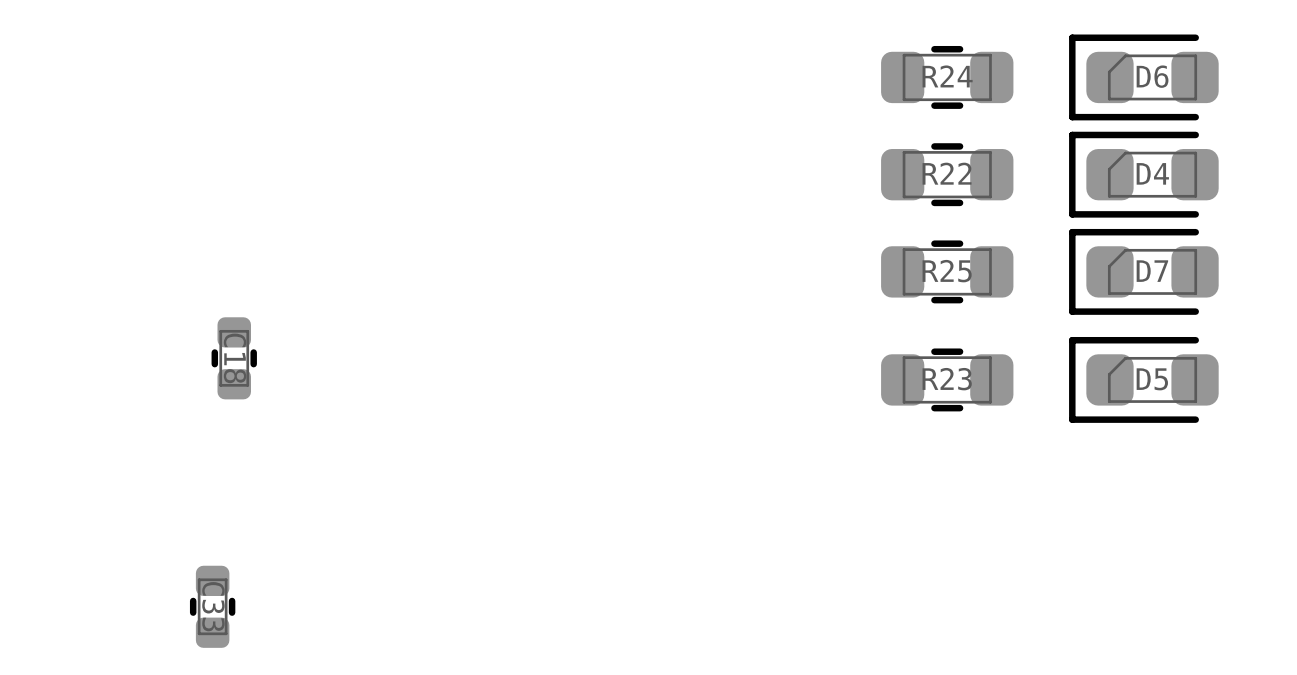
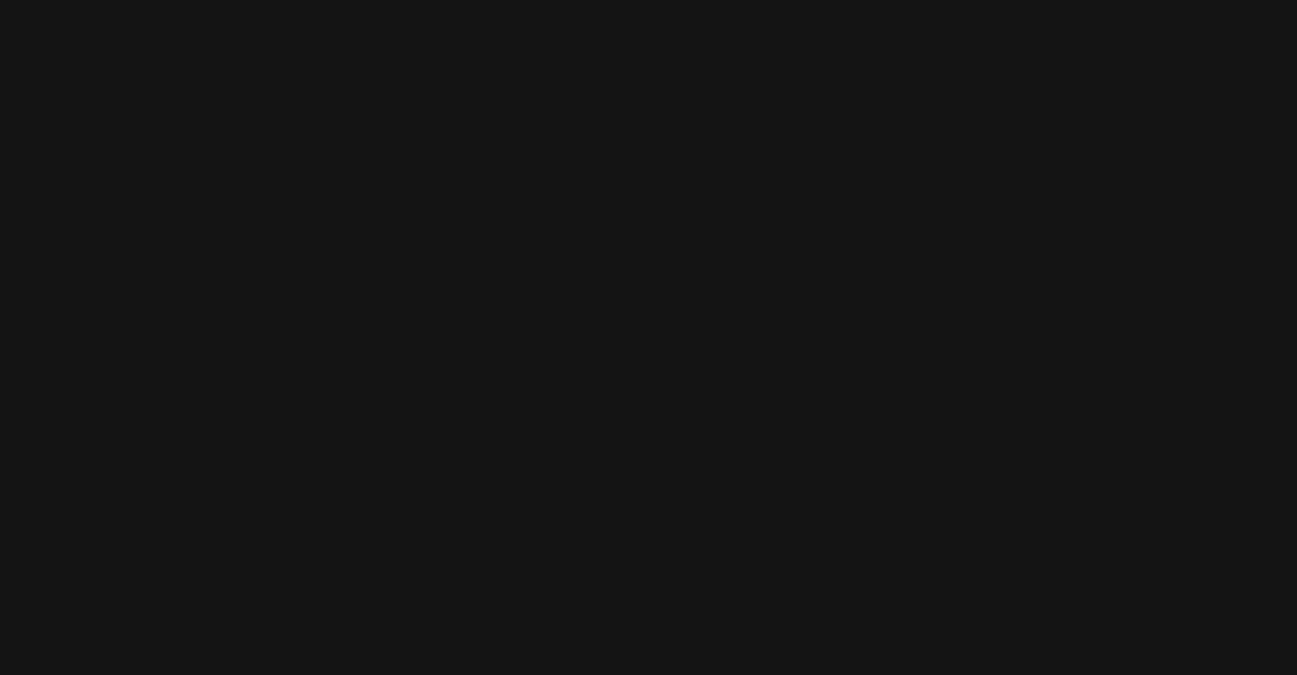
R24: (947, 77) -> none
D6: (1143, 77) -> none
R22: (947, 174) -> none
D4: (1143, 174) -> none
R25: (947, 271) -> none
D7: (1143, 271) -> none
part: (234, 358) -> none
R23: (947, 379) -> none
D5: (1143, 379) -> none
part: (212, 606) -> none

